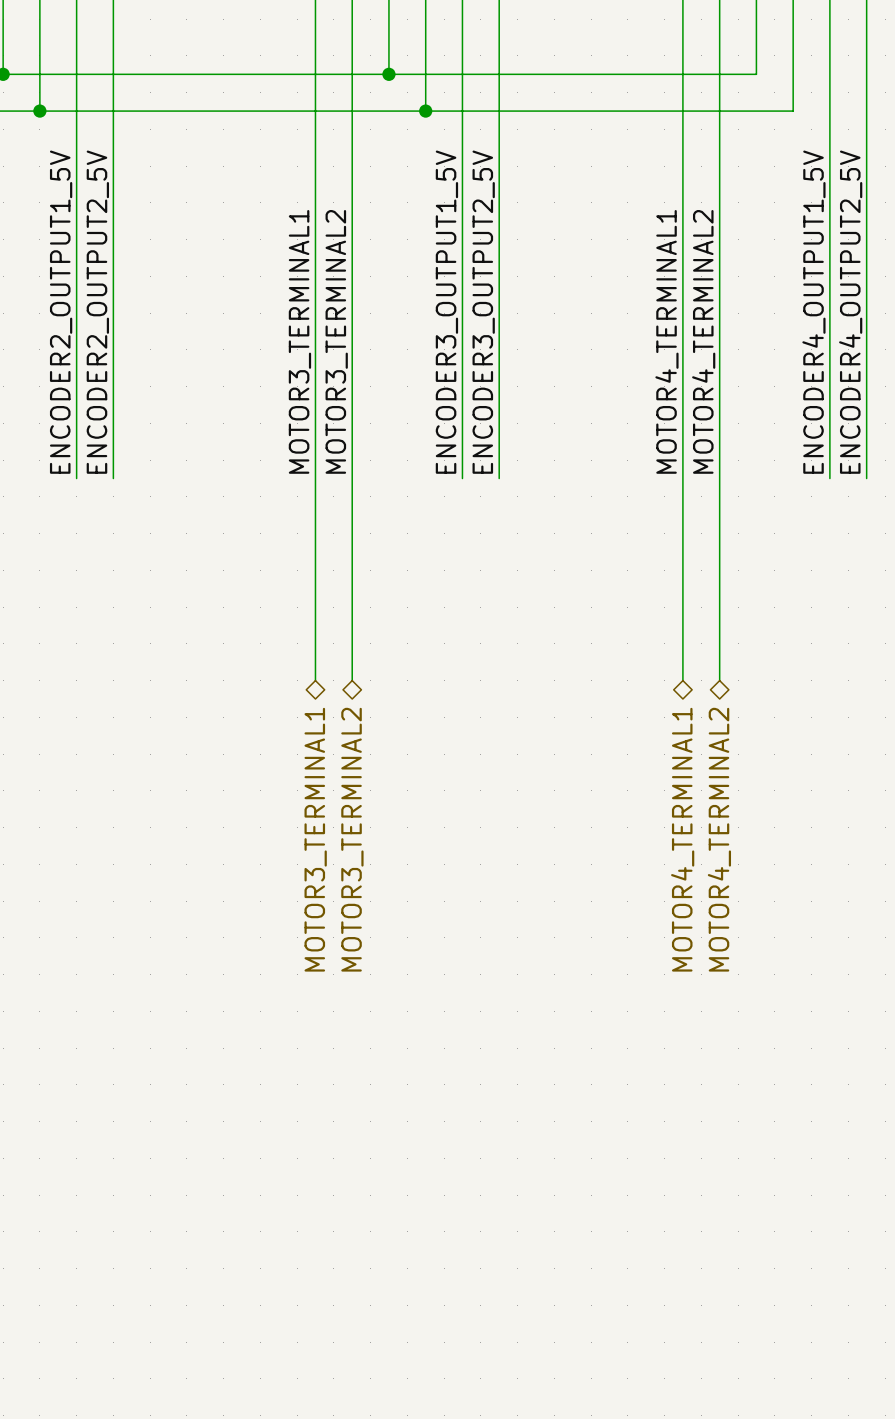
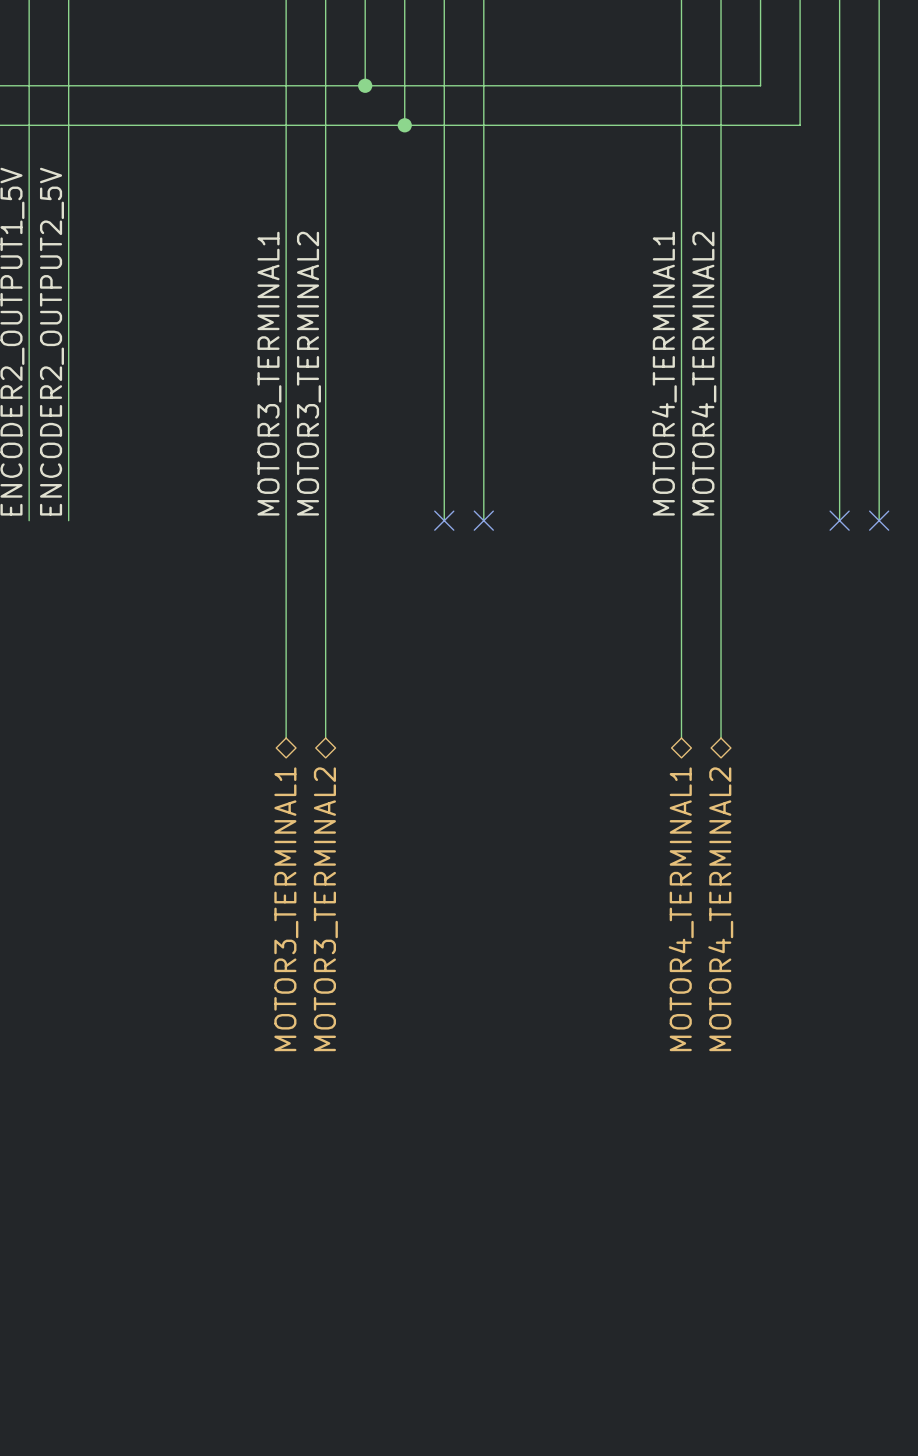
label: ENCODER3_OUTPUT1_5V (446, 312) -> none
label: ENCODER3_OUTPUT2_5V (483, 312) -> none
label: ENCODER4_OUTPUT1_5V (813, 312) -> none
label: ENCODER4_OUTPUT2_5V (850, 312) -> none
no-connect mark: none -> (444, 520)
no-connect mark: none -> (483, 520)
no-connect mark: none -> (839, 520)
no-connect mark: none -> (879, 520)

